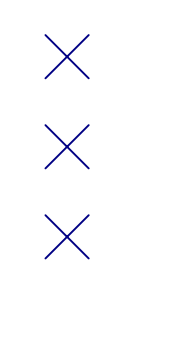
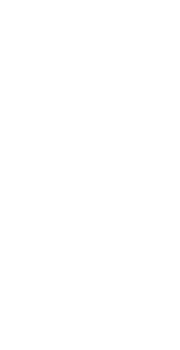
no-connect mark: (67, 56) -> none
no-connect mark: (67, 146) -> none
no-connect mark: (67, 236) -> none

